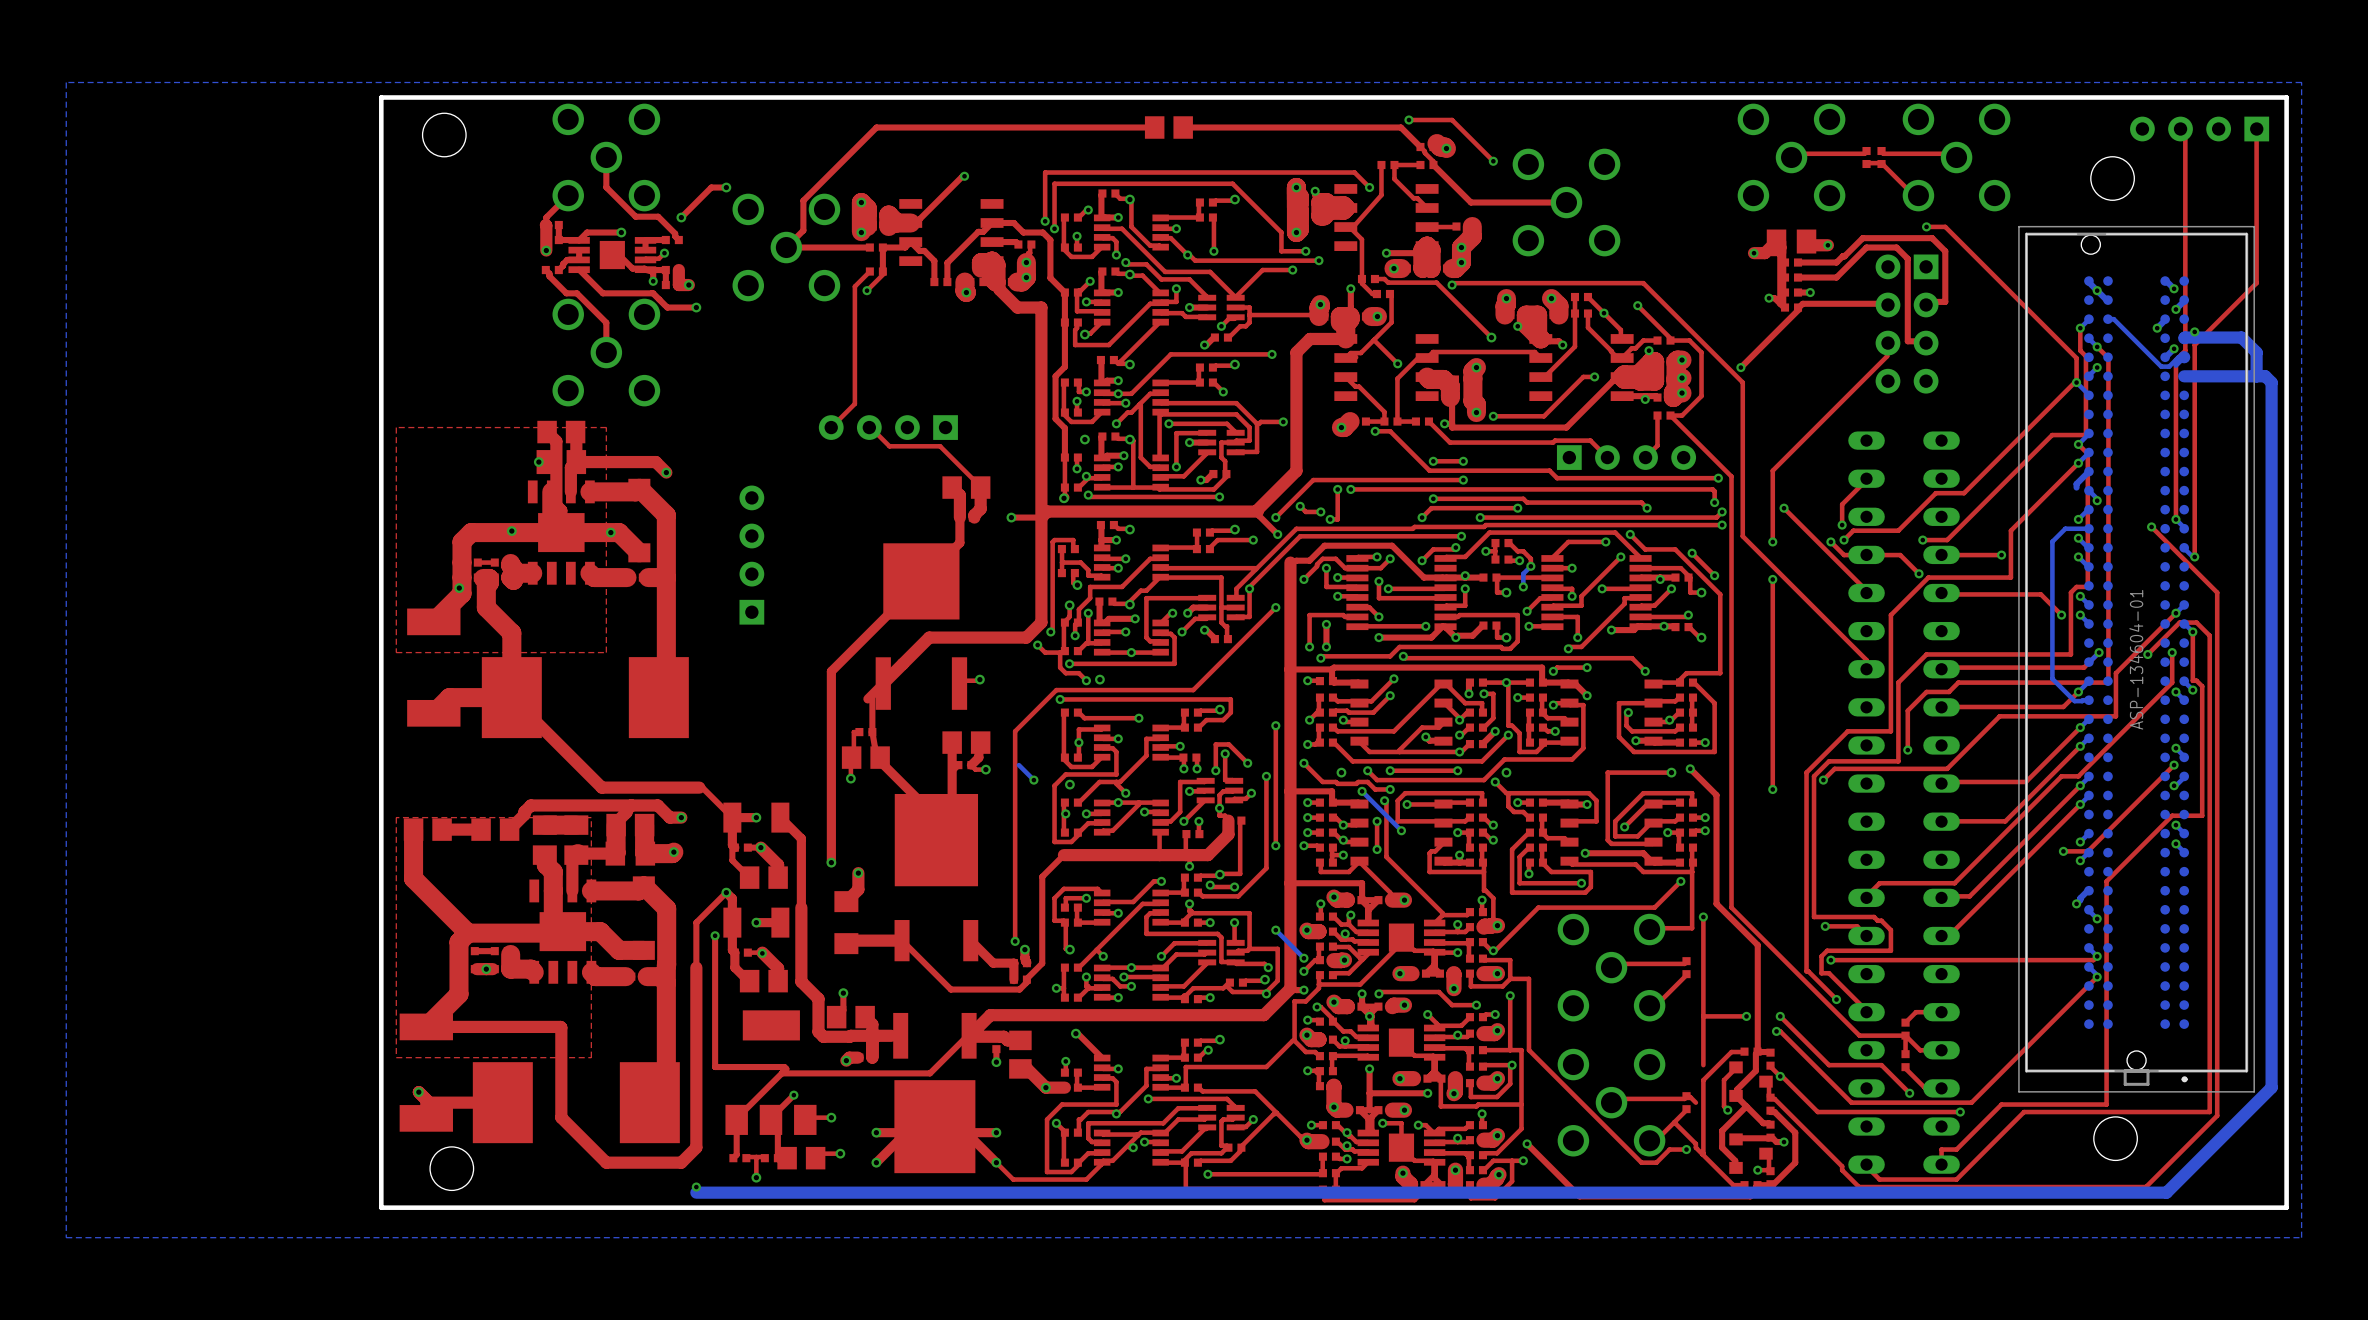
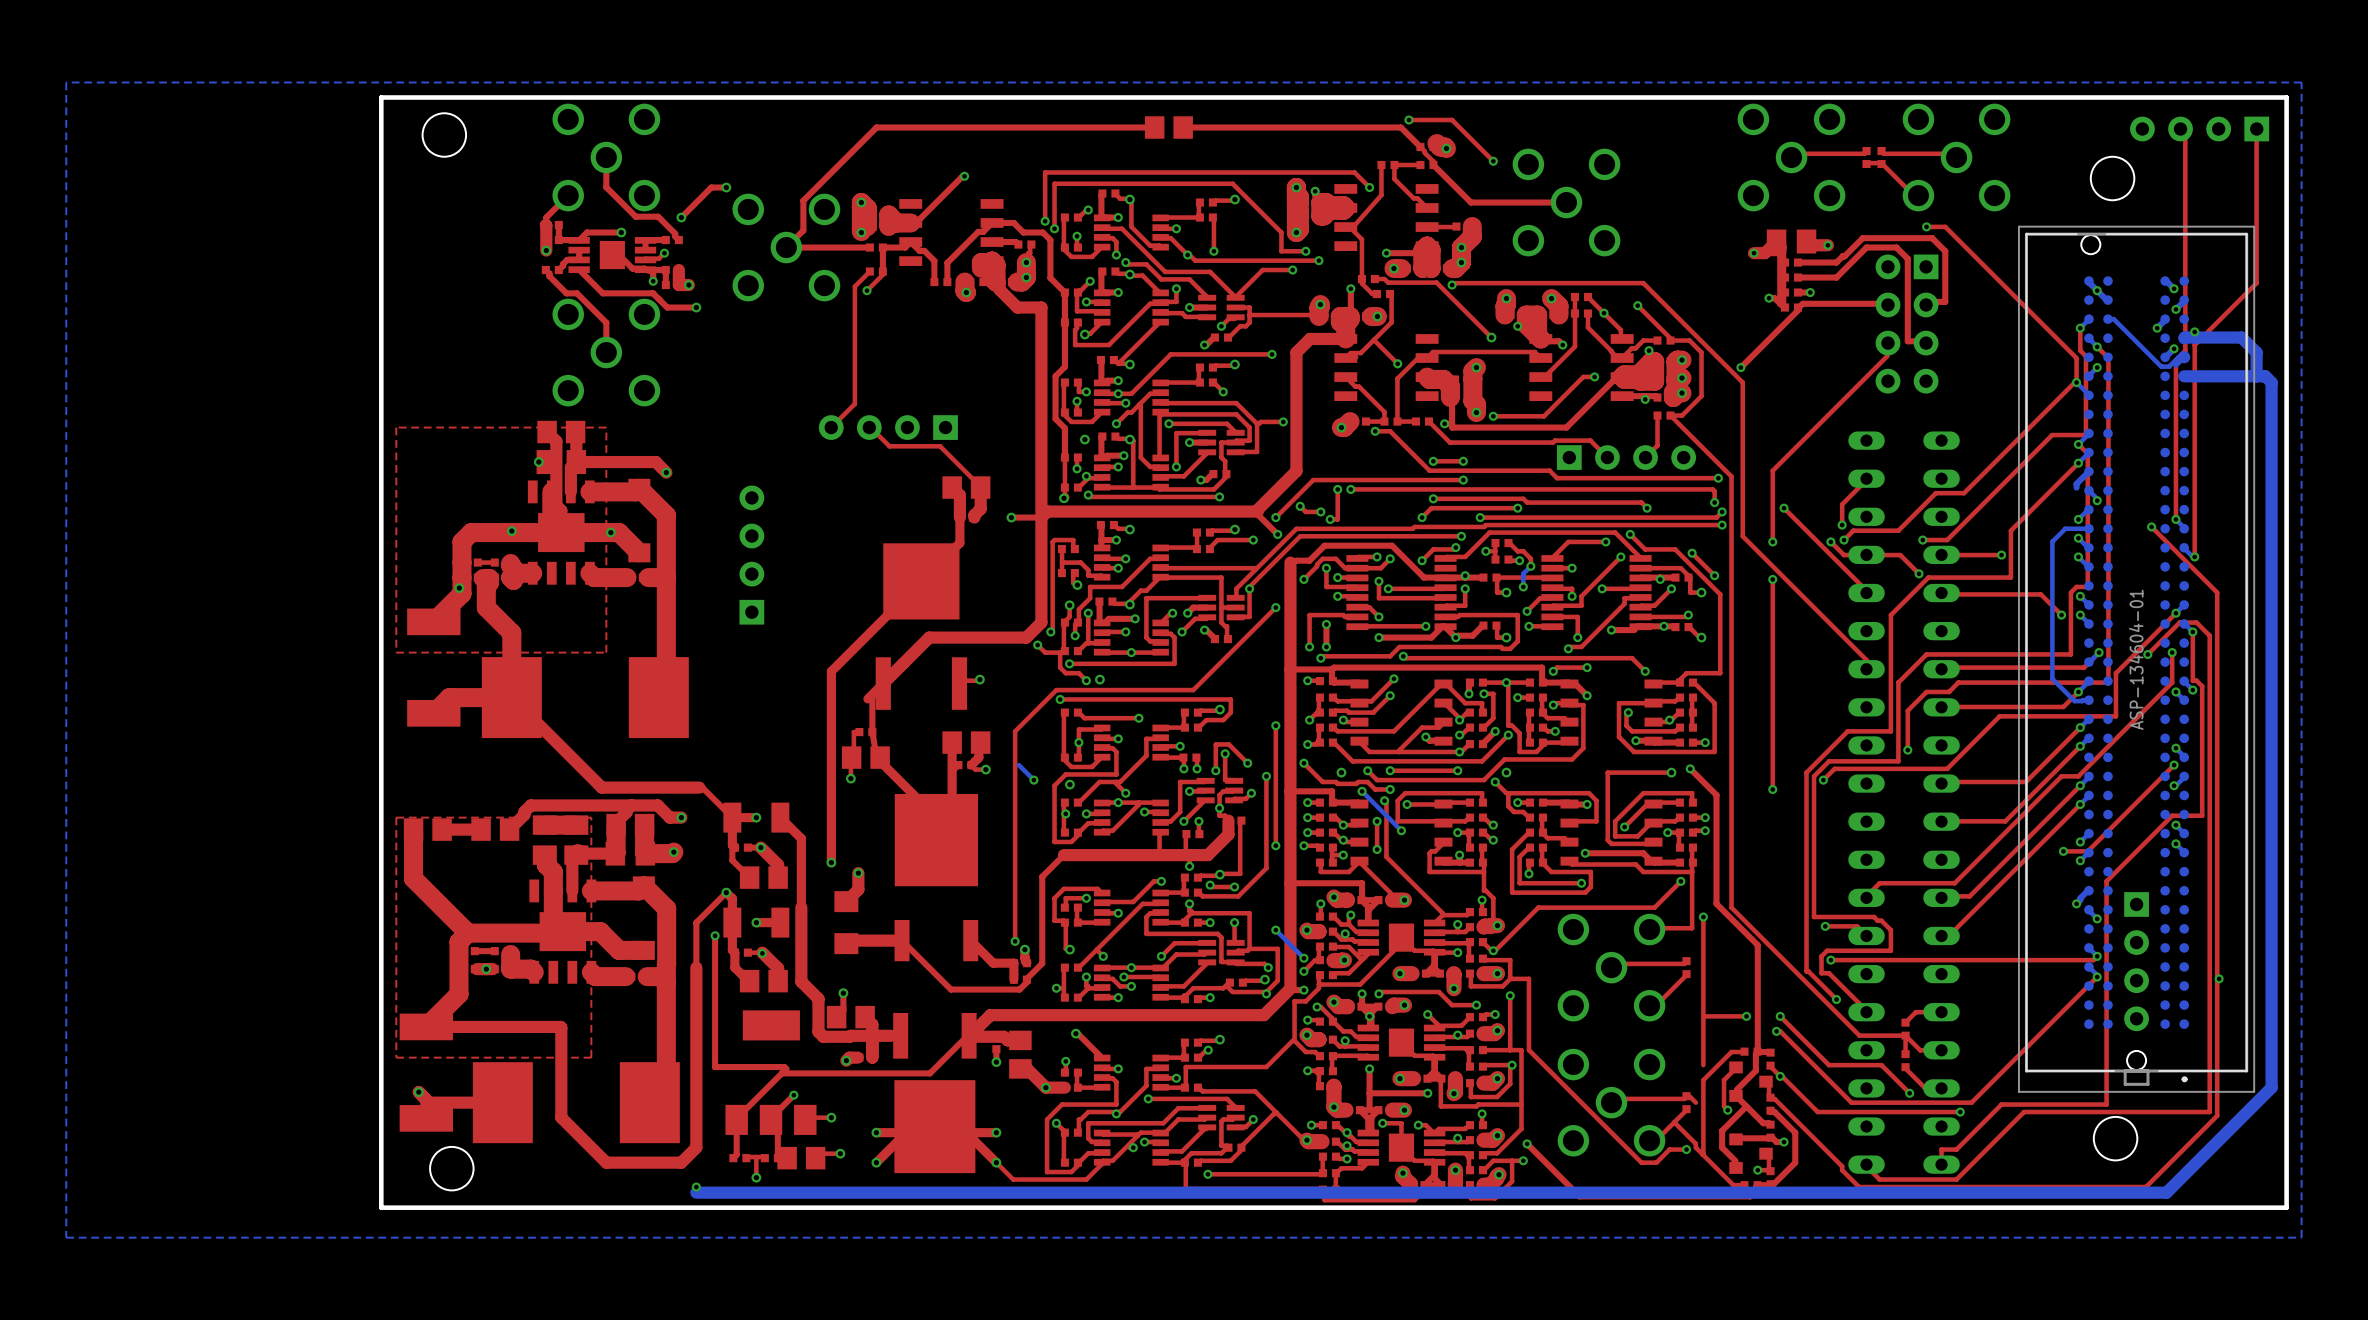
part: none -> (2136, 961)
via: none -> (2219, 978)

